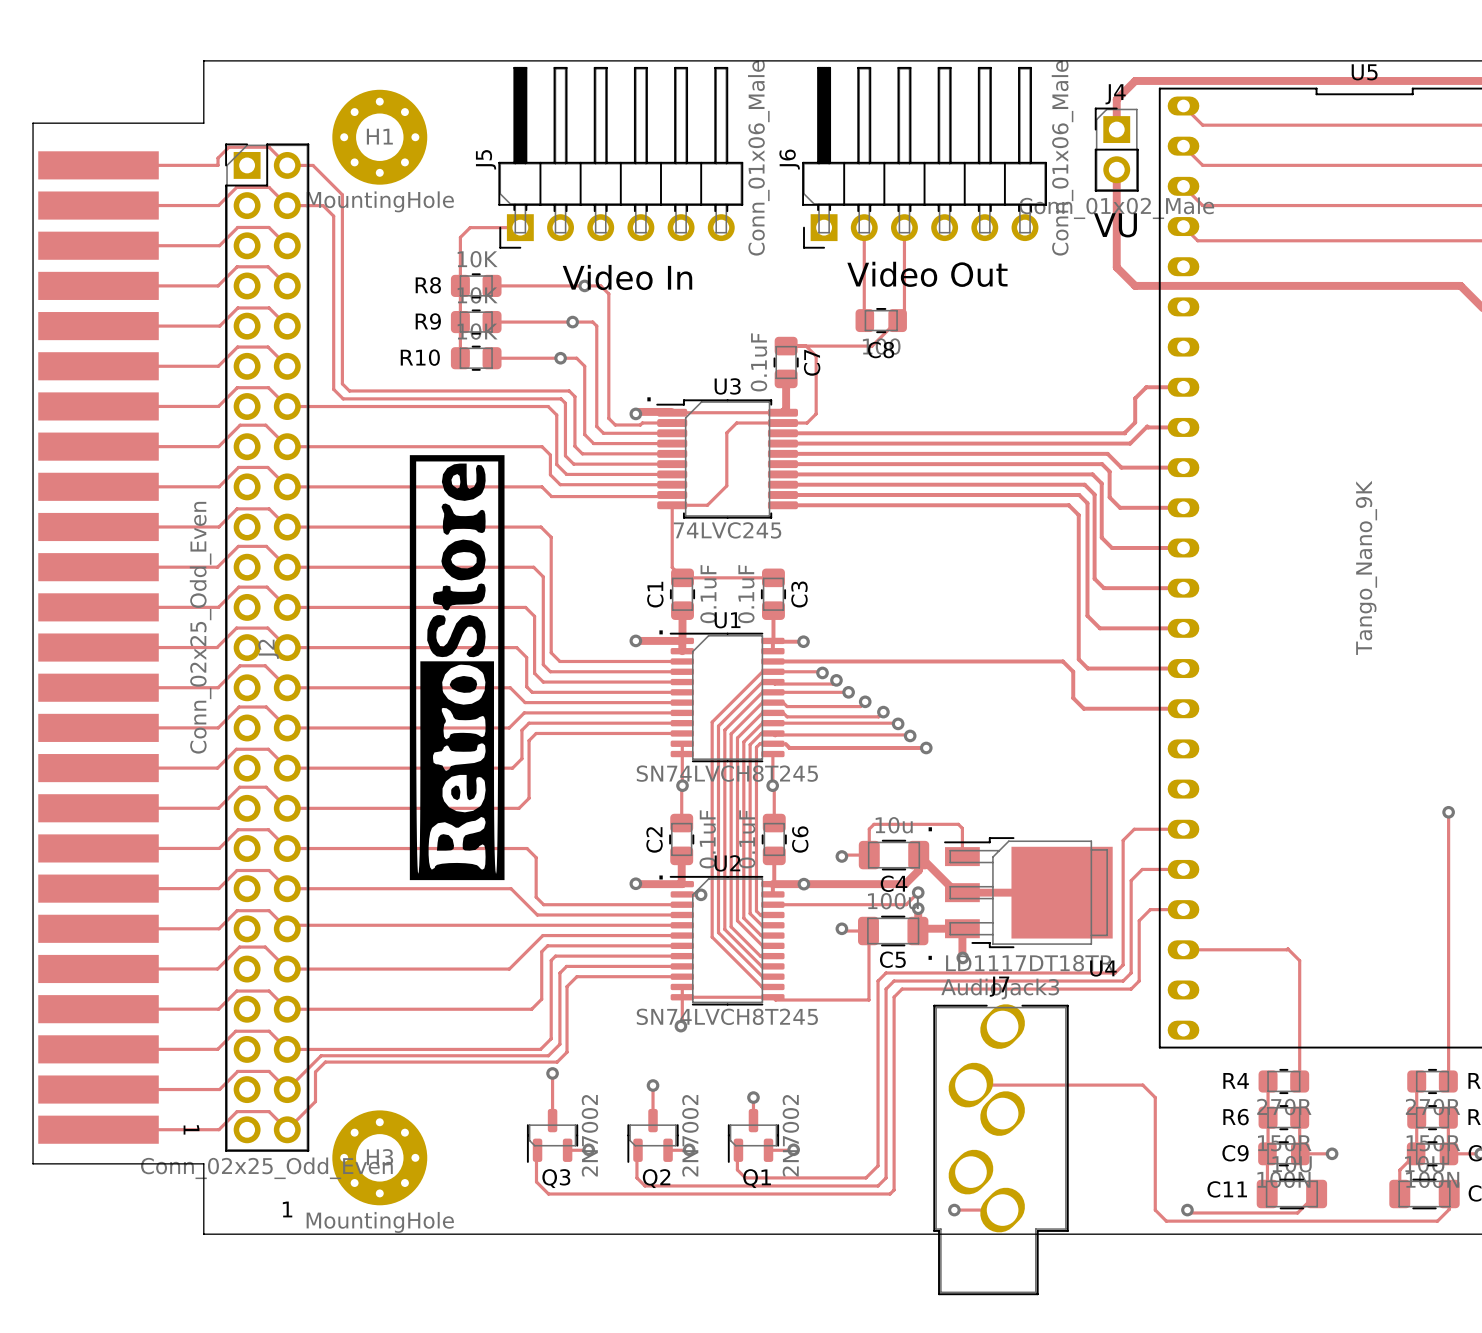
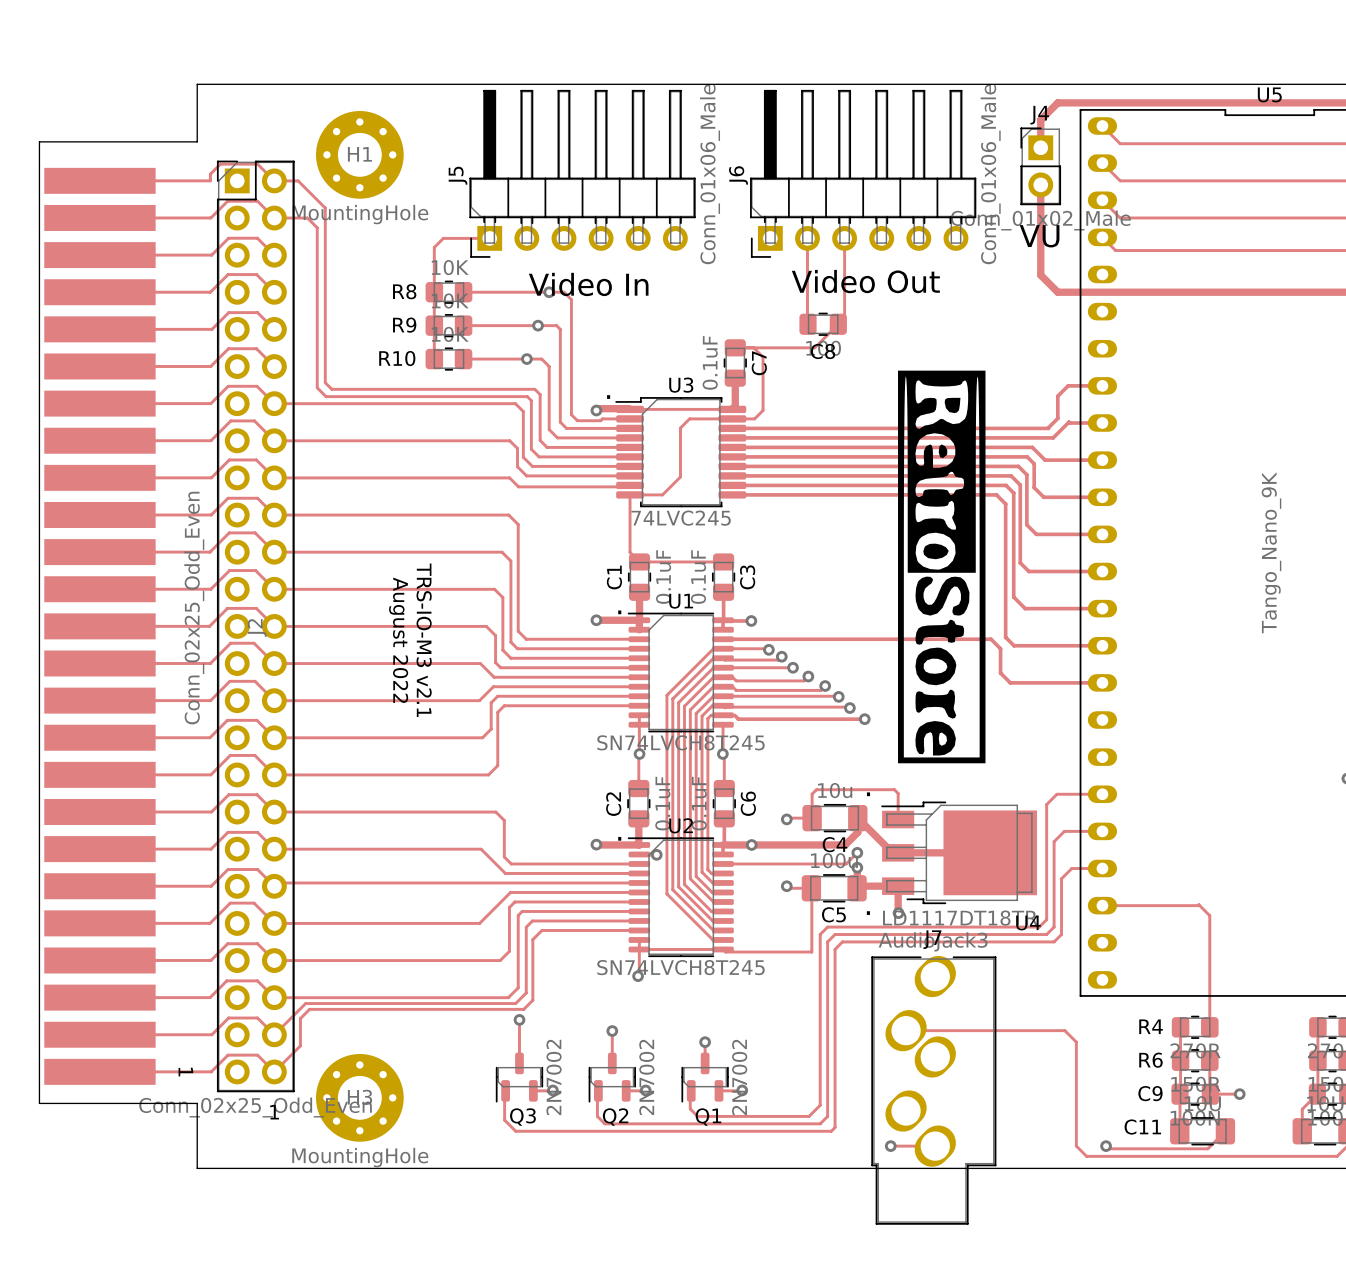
drawing: none -> [898, 370, 986, 764]
drawing: [409, 455, 505, 881] -> none
text: none -> August 2022 (398, 640)
text: none -> TRS-IO-M3 v2.1 (424, 640)
text position: 1 (287, 1209) -> 1 (274, 1112)

